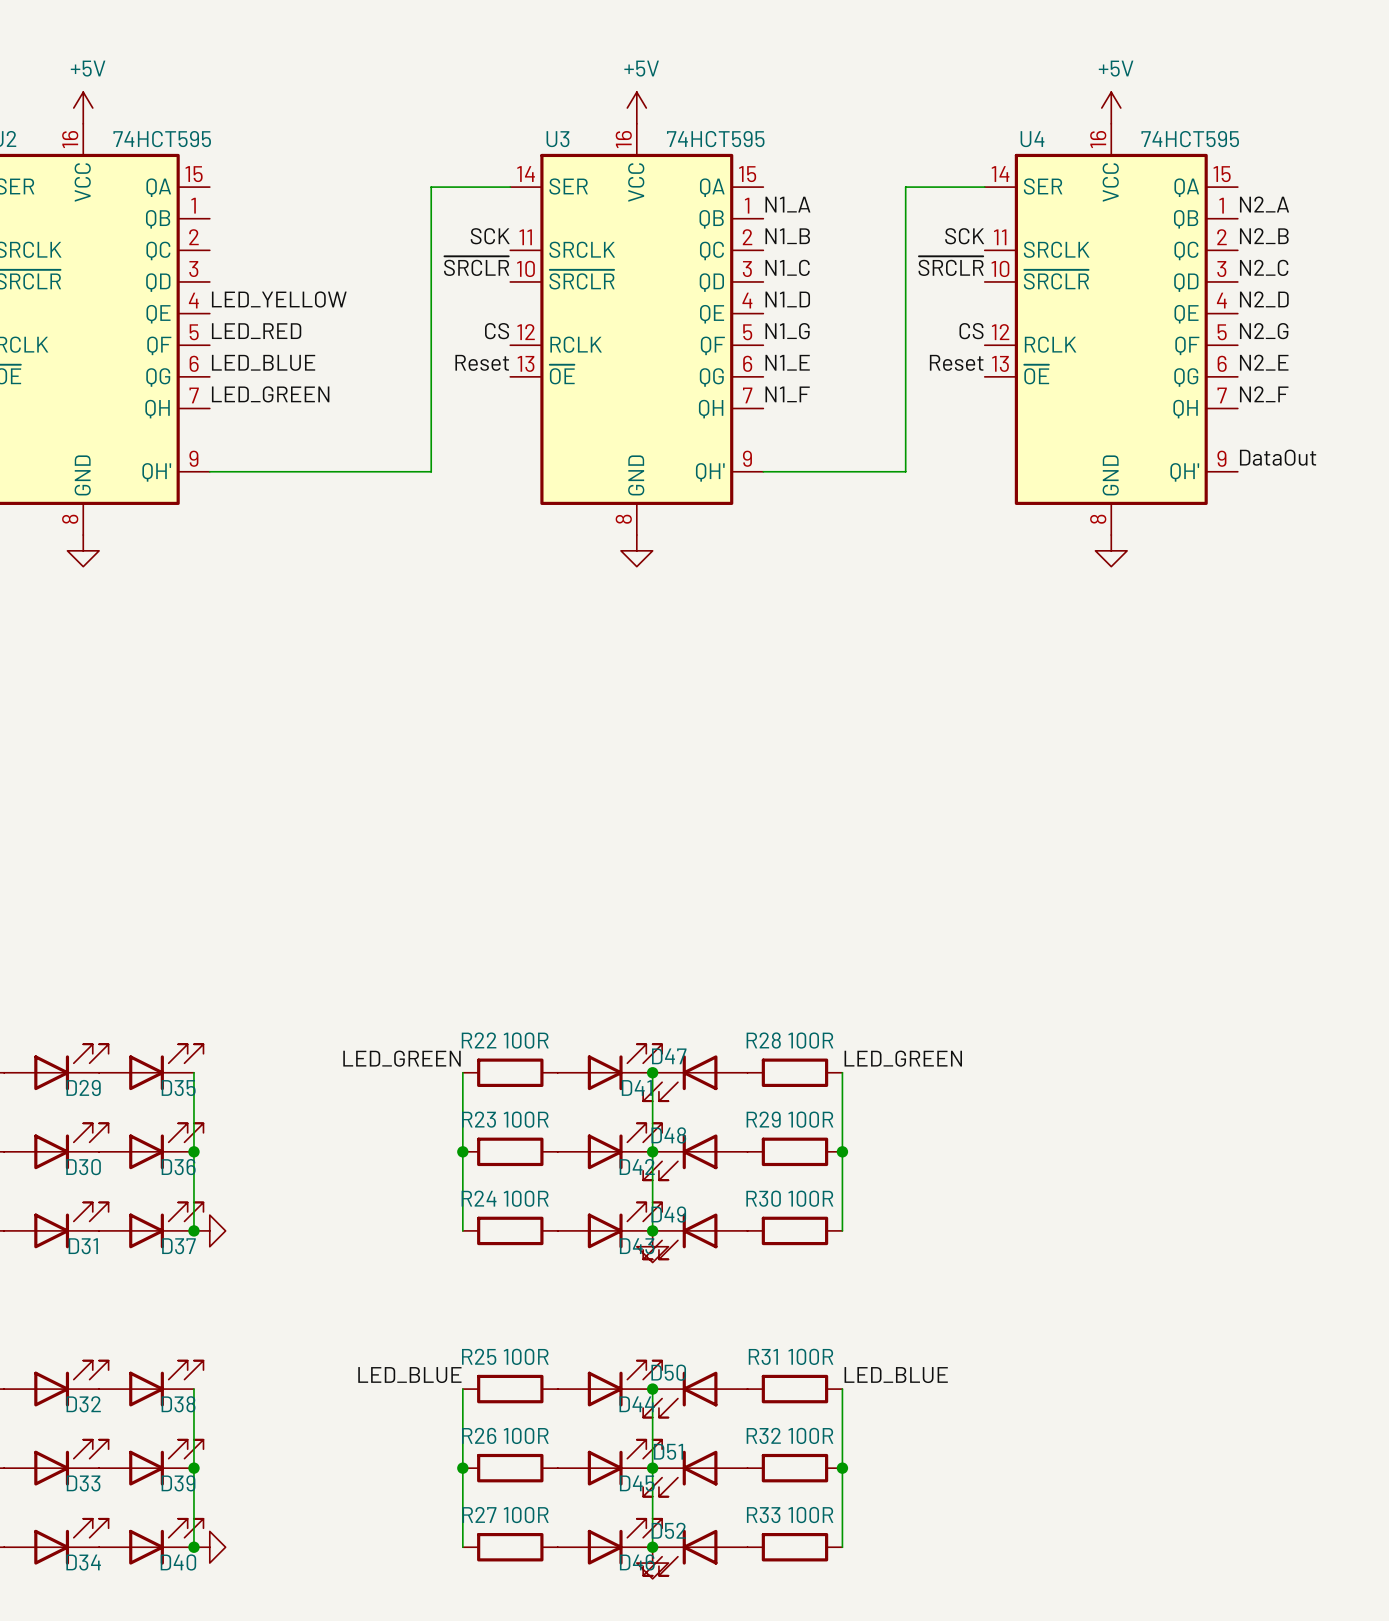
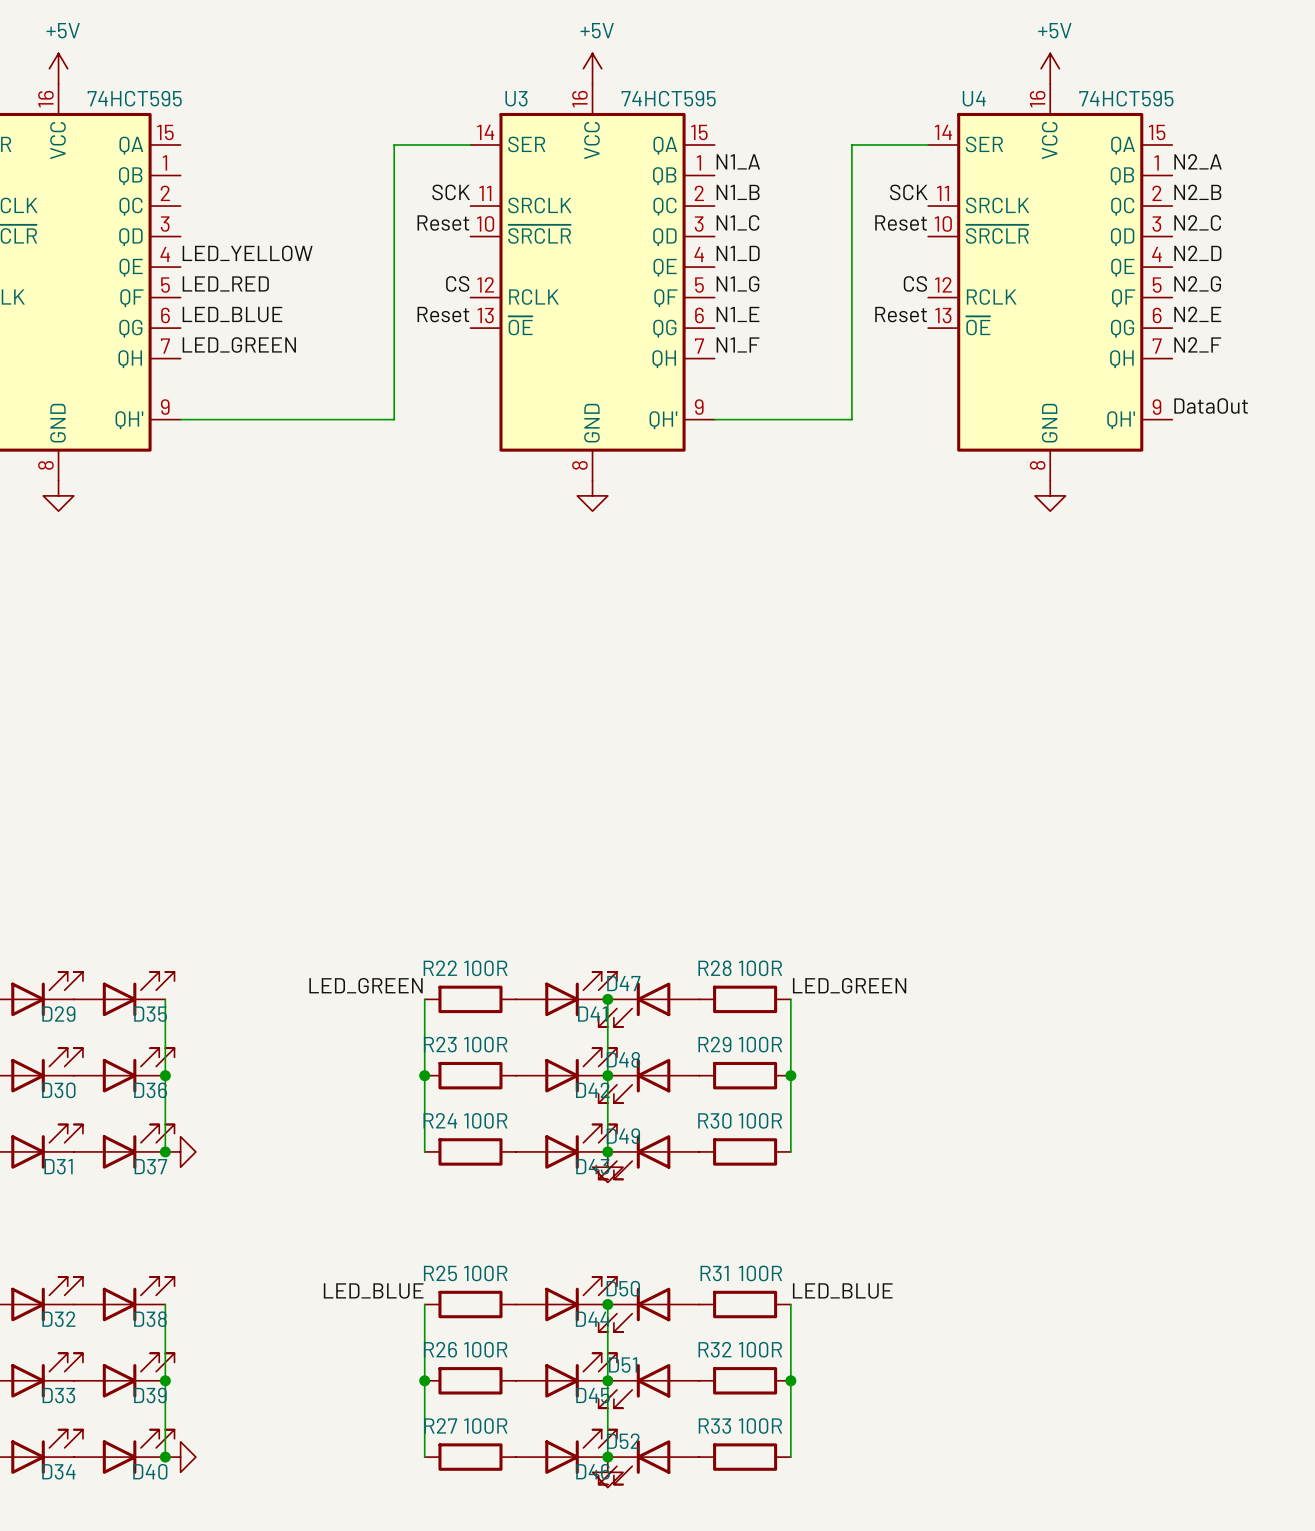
label: ~{SRCLR} (476, 266) -> Reset (443, 223)
label: ~{SRCLR} (951, 266) -> Reset (901, 223)

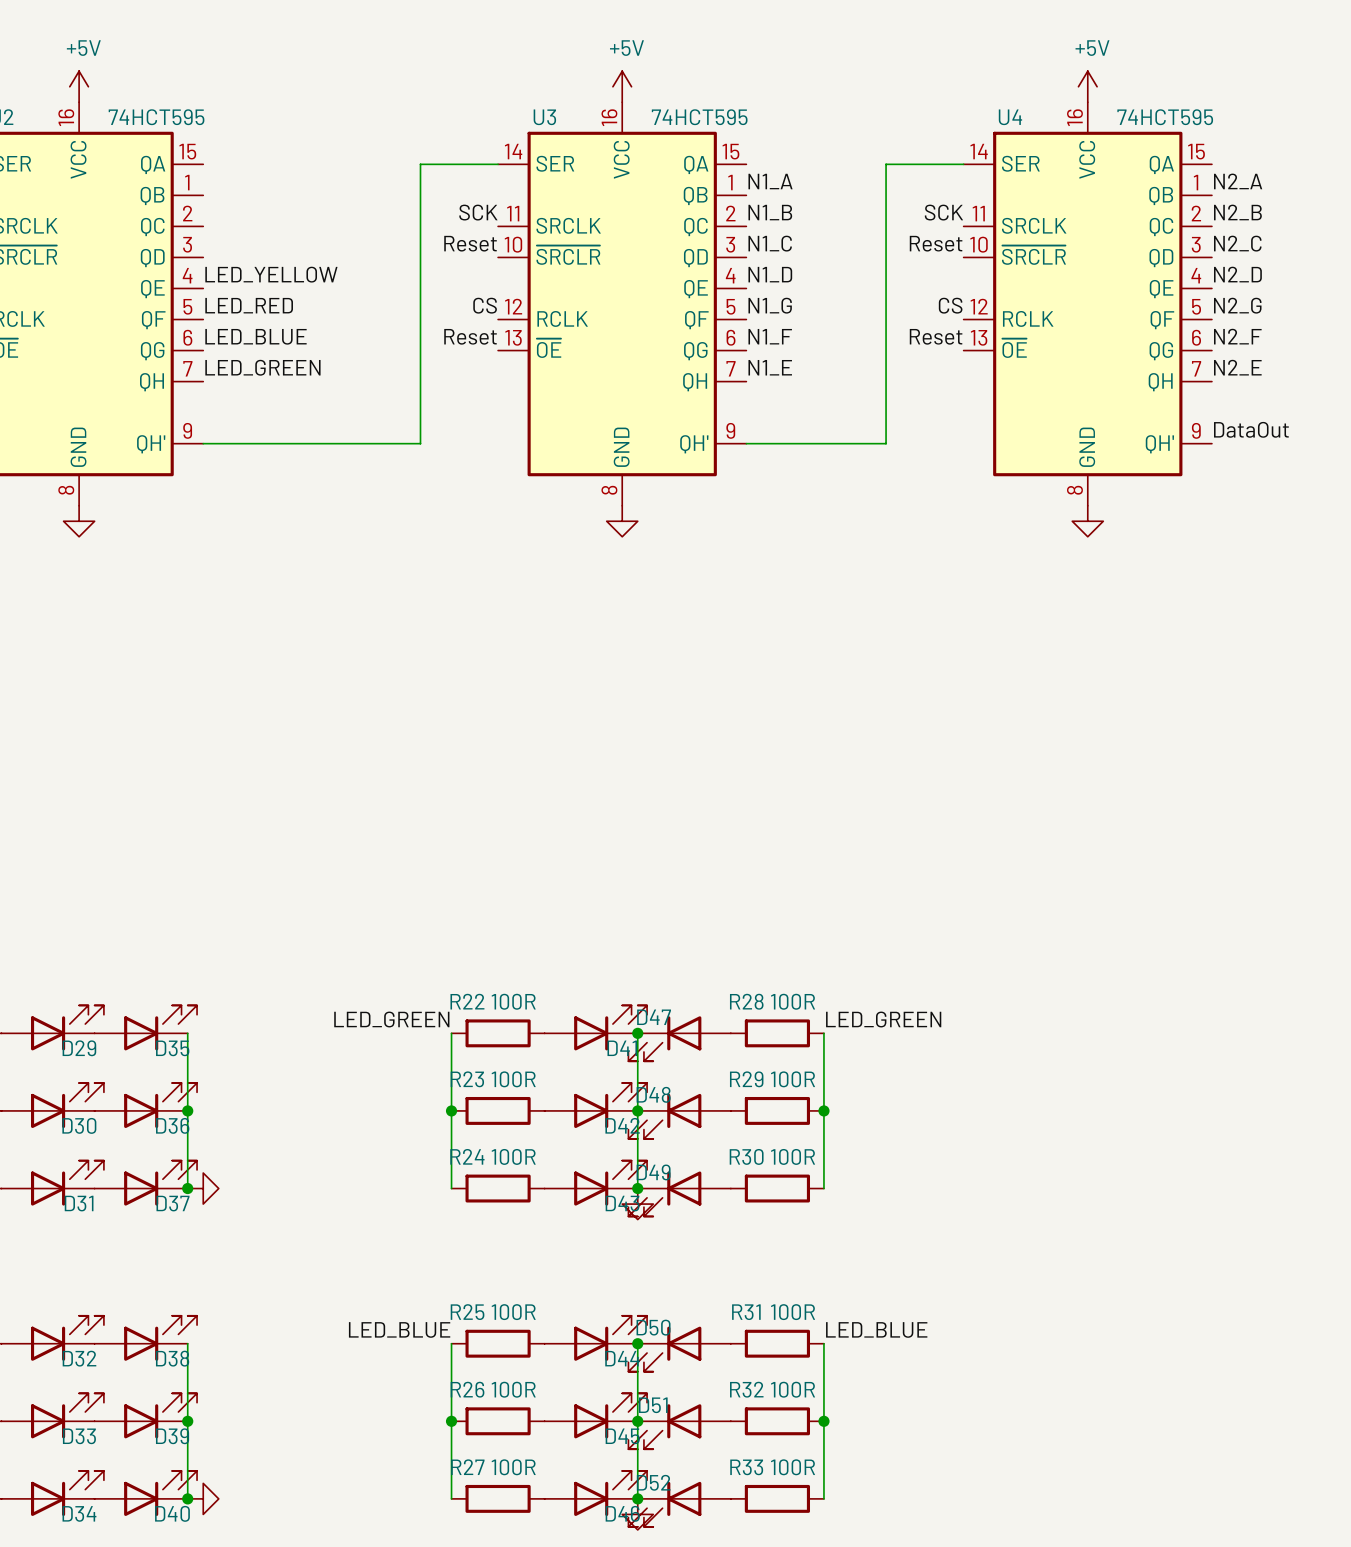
label: N1_E (738, 314) -> N1_F (770, 336)
label: N2_E (1197, 314) -> N2_F (1237, 336)
label: N1_F (738, 344) -> N1_E (770, 367)
label: N2_F (1197, 344) -> N2_E (1237, 367)

